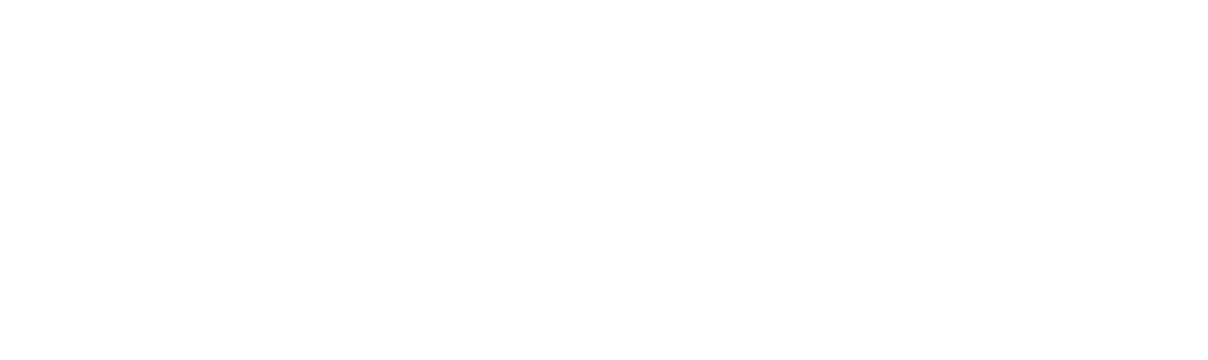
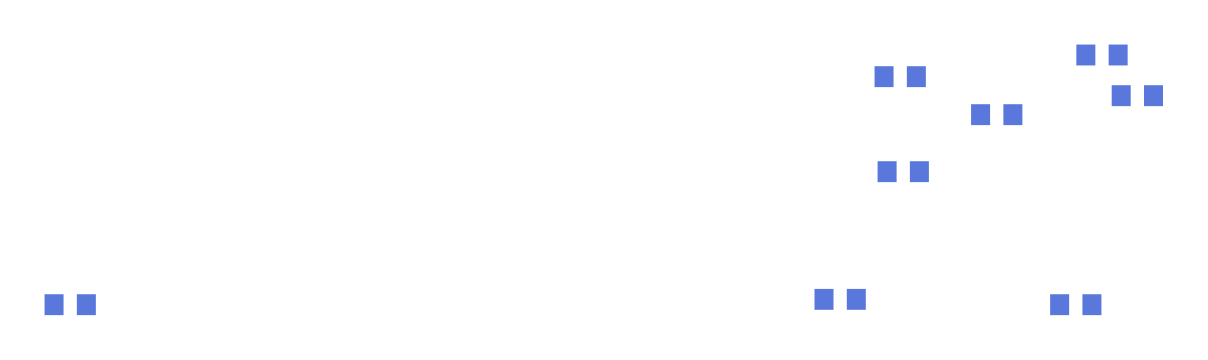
part: none -> (1102, 55)
part: none -> (900, 76)
part: none -> (1137, 95)
part: none -> (996, 114)
part: none -> (903, 171)
part: none -> (840, 299)
part: none -> (70, 304)
part: none -> (1075, 304)

